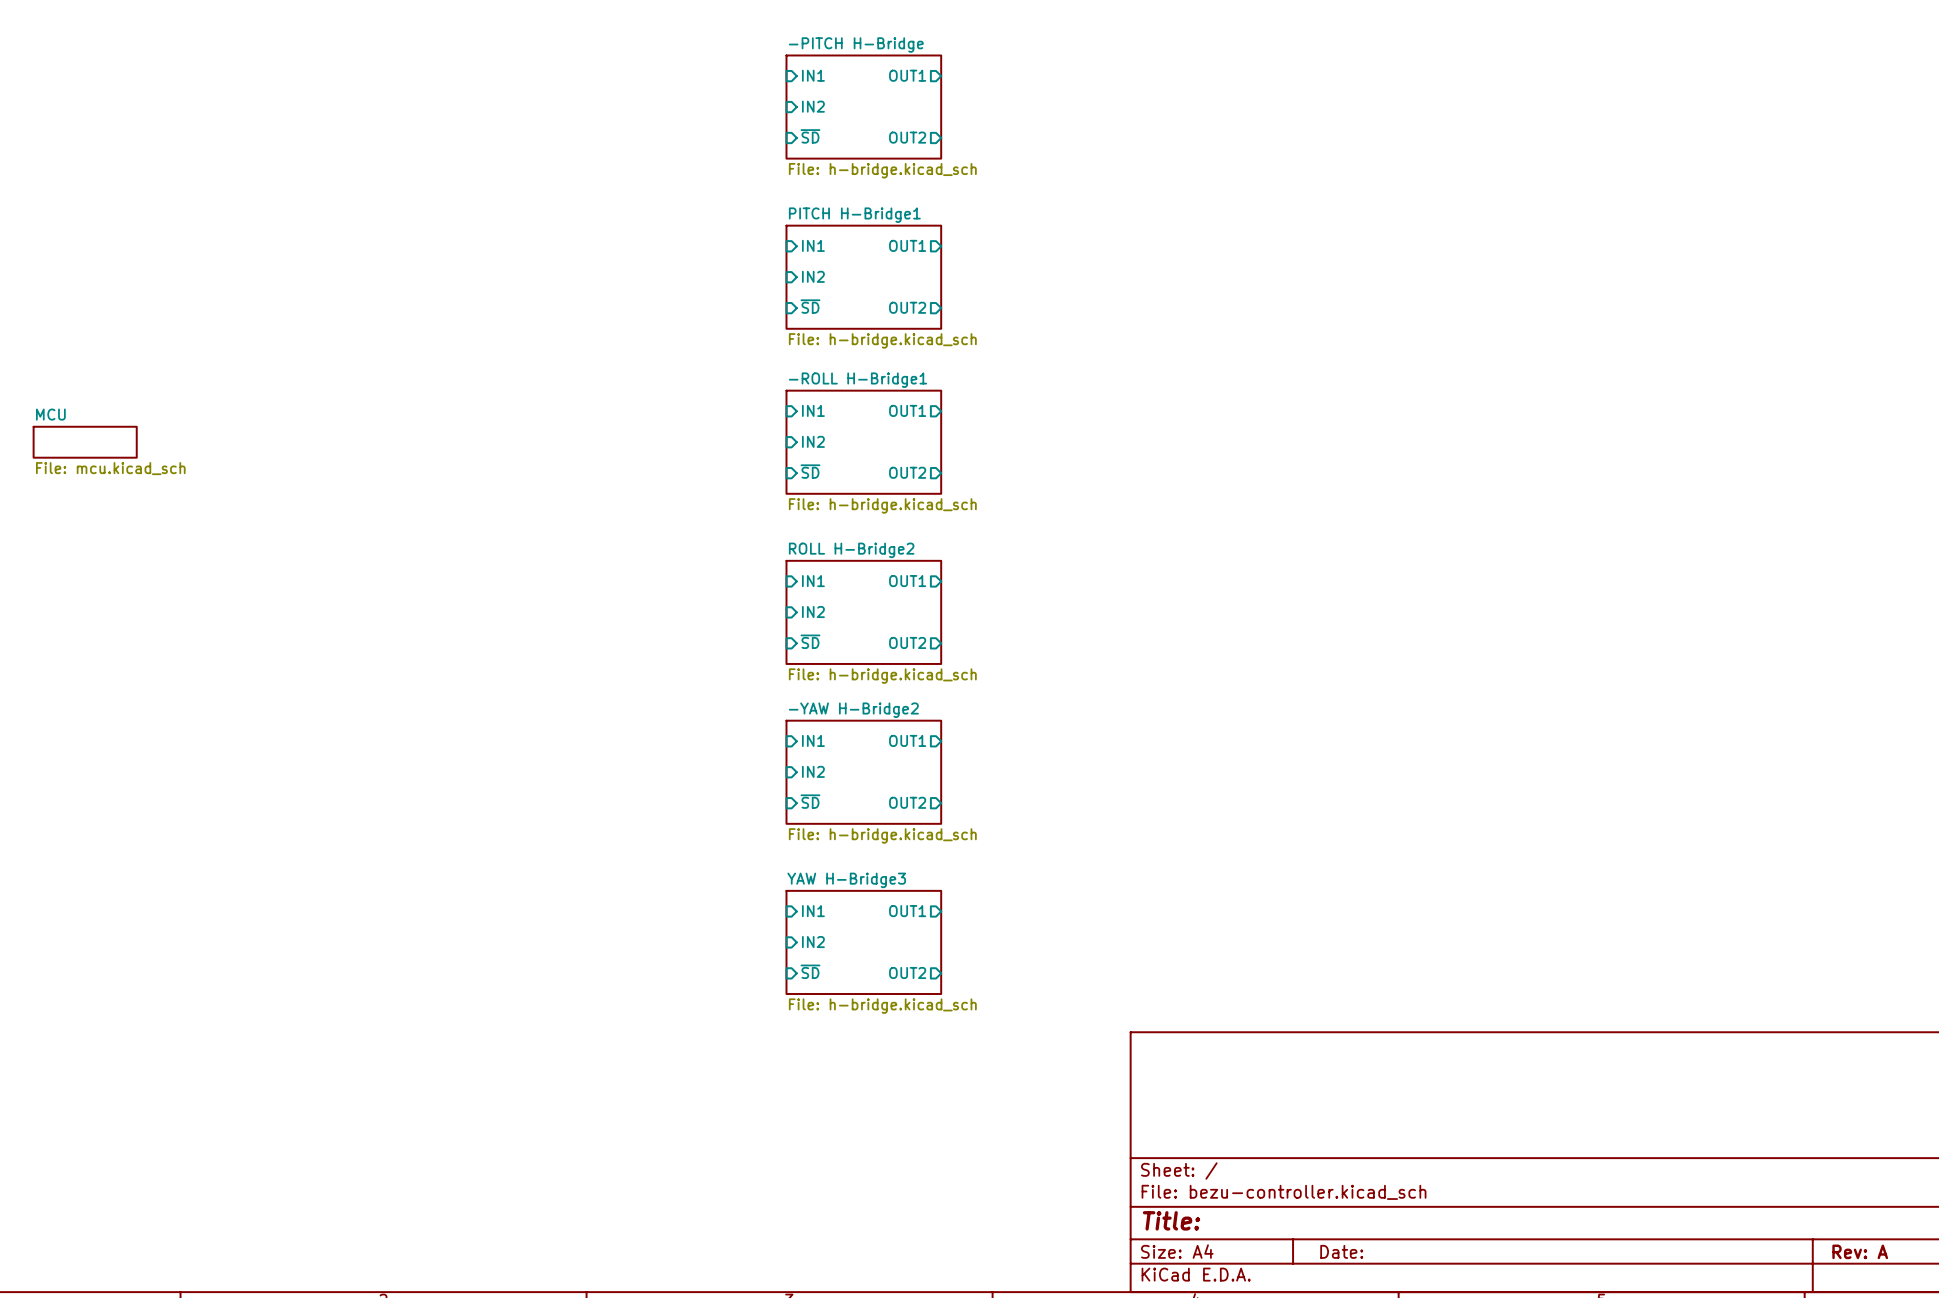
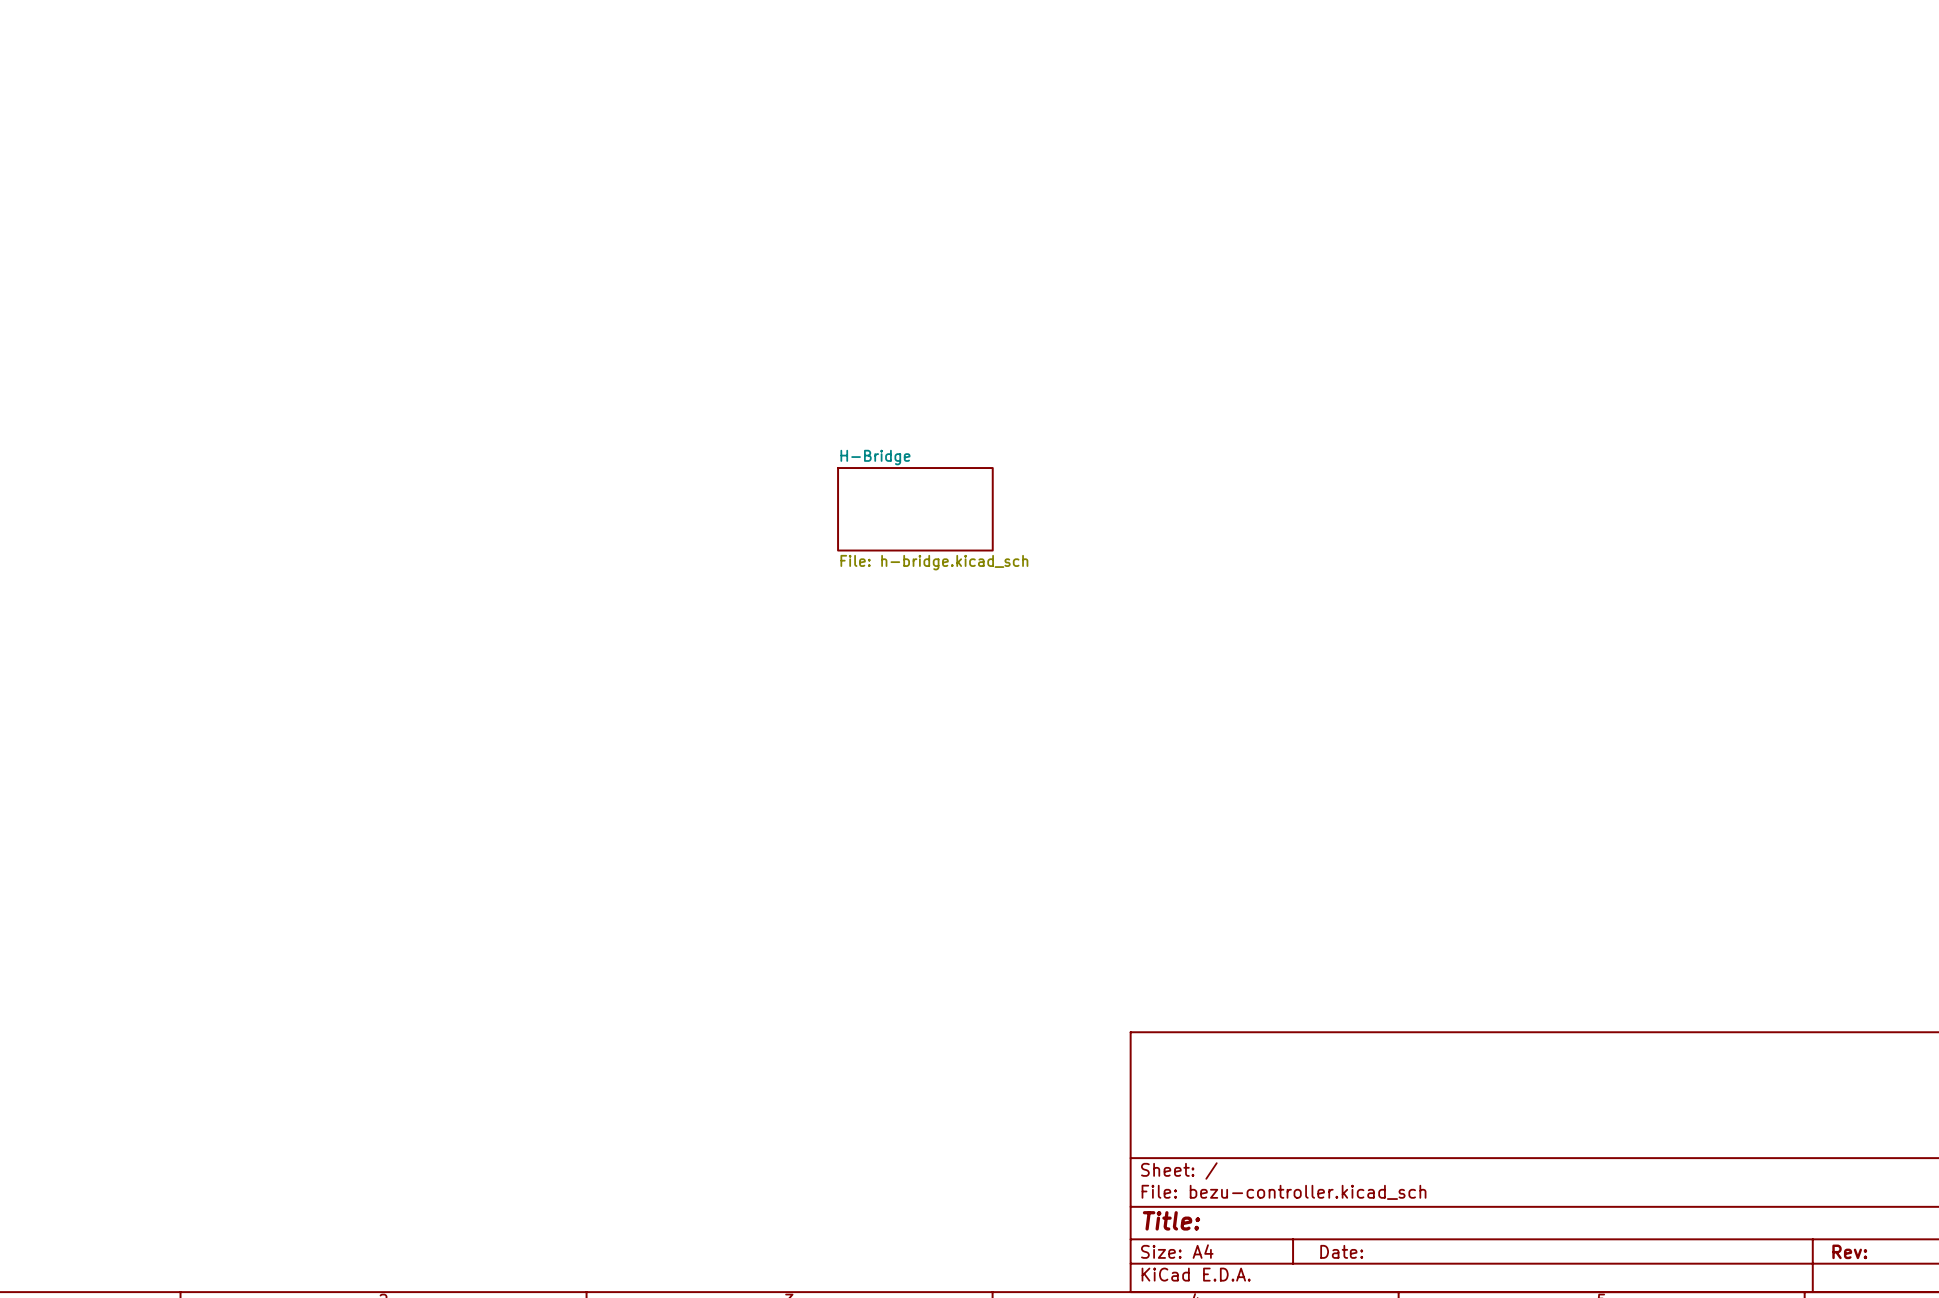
sheet pin: IN1 (813, 75) -> none
sheet pin: OUT1 (907, 75) -> none
sheet pin: IN2 (813, 106) -> none
sheet -PITCH H-Bridge: File: h-bridge.kicad_sch (863, 107) -> none
sheet pin: ~{SD} (810, 136) -> none
sheet pin: OUT2 (907, 137) -> none
sheet pin: IN1 (813, 245) -> none
sheet pin: OUT1 (907, 245) -> none
sheet pin: IN2 (813, 276) -> none
sheet PITCH H-Bridge1: File: h-bridge.kicad_sch (863, 277) -> none
sheet pin: ~{SD} (810, 306) -> none
sheet pin: OUT2 (907, 307) -> none
sheet pin: IN1 (813, 410) -> none
sheet pin: OUT1 (907, 410) -> none
sheet pin: IN2 (813, 441) -> none
sheet MCU: File: mcu.kicad_sch (85, 442) -> none
sheet -ROLL H-Bridge1: File: h-bridge.kicad_sch (863, 442) -> none
sheet pin: ~{SD} (810, 471) -> none
sheet pin: OUT2 (907, 472) -> none
sheet H-Bridge: none -> File: h-bridge.kicad_sch (915, 509)
sheet pin: IN1 (813, 581) -> none
sheet pin: OUT1 (907, 581) -> none
sheet pin: IN2 (813, 612) -> none
sheet ROLL H-Bridge2: File: h-bridge.kicad_sch (863, 612) -> none
sheet pin: ~{SD} (810, 641) -> none
sheet pin: OUT2 (907, 642) -> none
sheet pin: IN1 (813, 740) -> none
sheet pin: OUT1 (907, 740) -> none
sheet pin: IN2 (813, 771) -> none
sheet -YAW H-Bridge2: File: h-bridge.kicad_sch (863, 772) -> none
sheet pin: ~{SD} (810, 801) -> none
sheet pin: OUT2 (907, 802) -> none
sheet pin: IN1 (813, 911) -> none
sheet pin: OUT1 (907, 911) -> none
sheet pin: IN2 (813, 942) -> none
sheet YAW H-Bridge3: File: h-bridge.kicad_sch (863, 942) -> none
sheet pin: ~{SD} (810, 971) -> none
sheet pin: OUT2 (907, 972) -> none
title block: Rev: A (1860, 1251) -> Rev: (1849, 1251)

